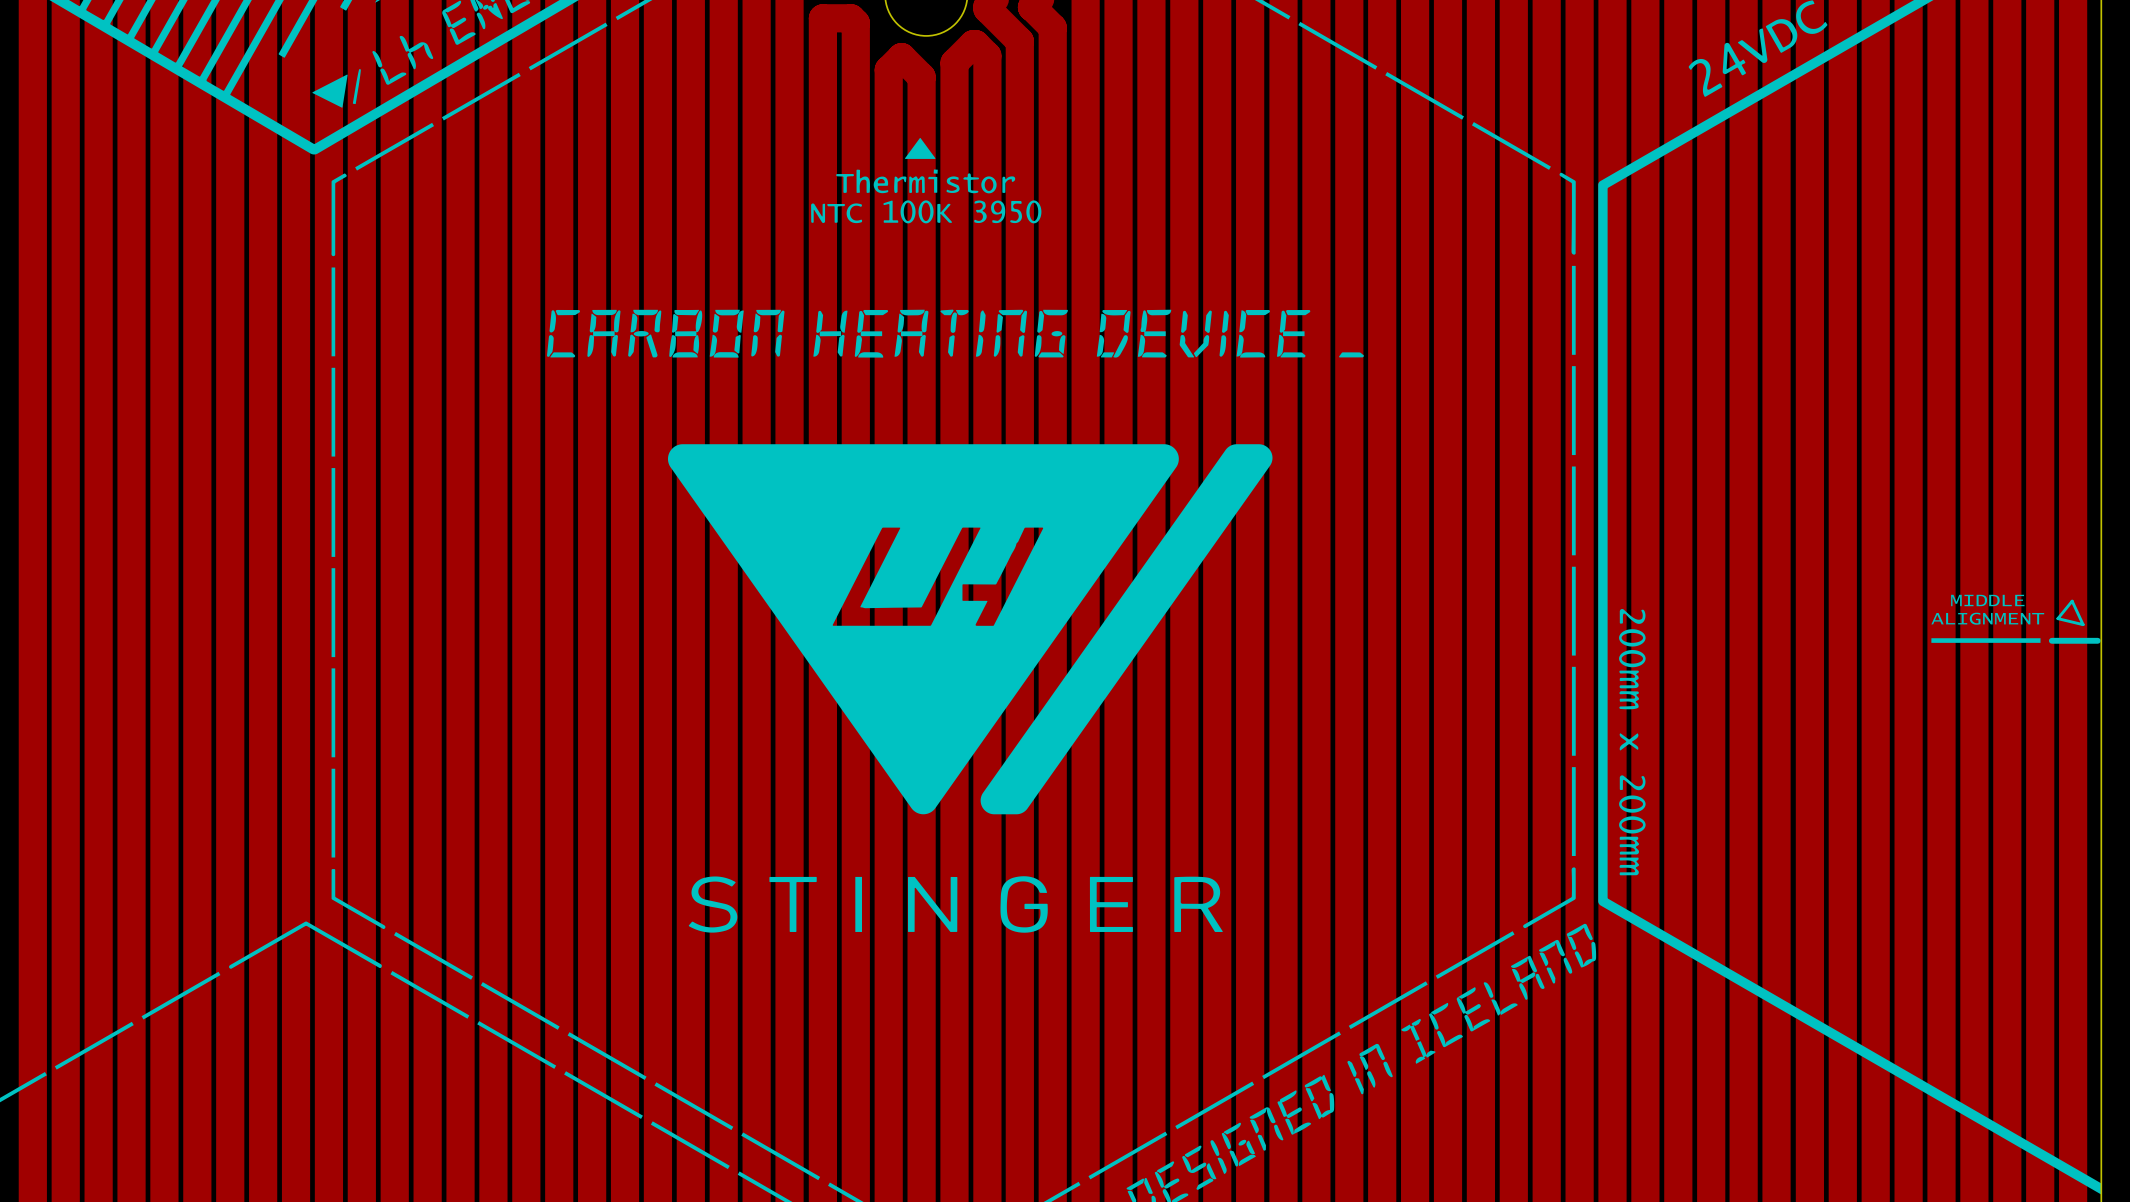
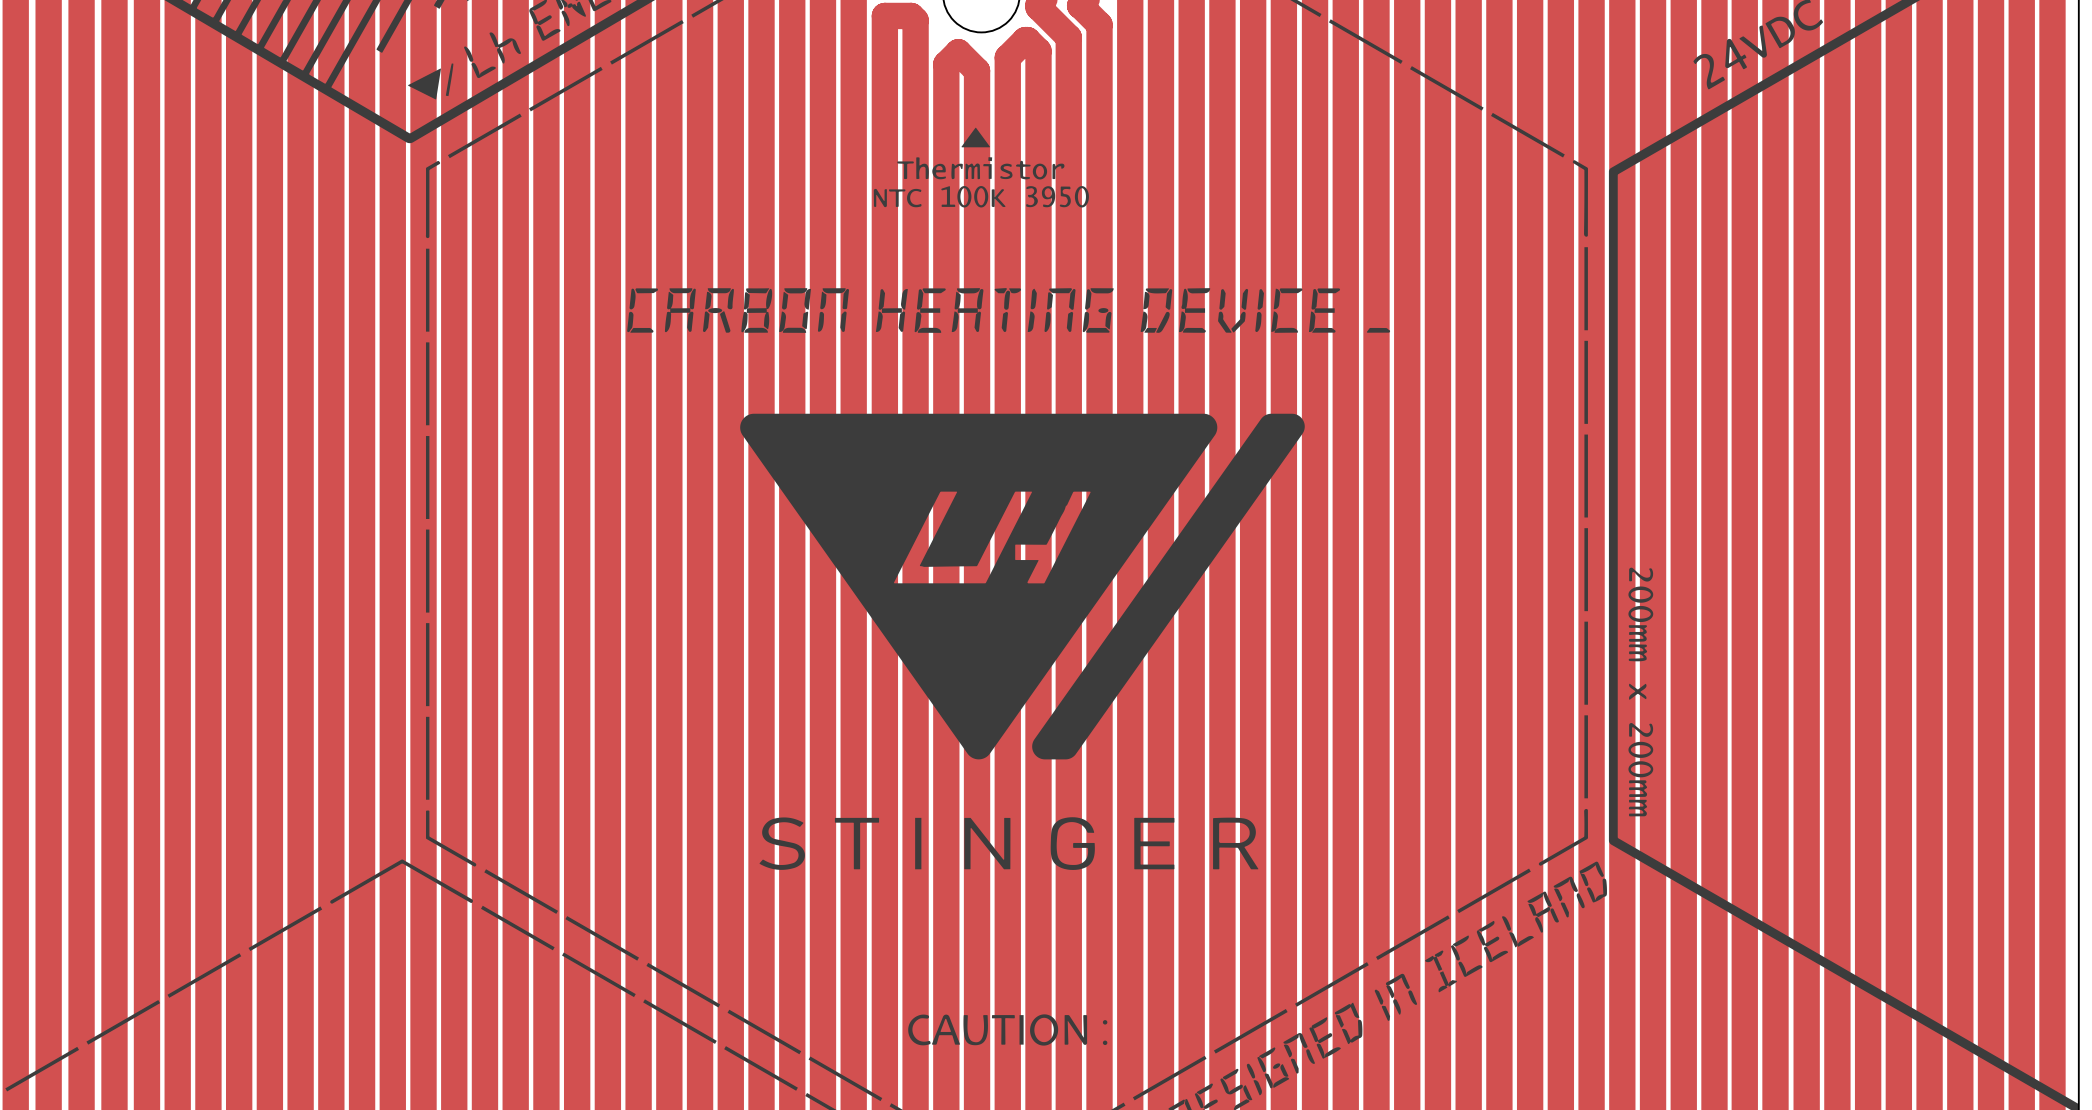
drawing: [1931, 594, 2045, 643] -> none
line: (2072, 601) (2057, 618) (2083, 624) (2072, 601) -> none
line: (2051, 640) (2097, 640) -> none
drawing: none -> [908, 1014, 1088, 1046]
drawing: none -> [1102, 1020, 1108, 1025]
drawing: none -> [1102, 1040, 1108, 1046]

